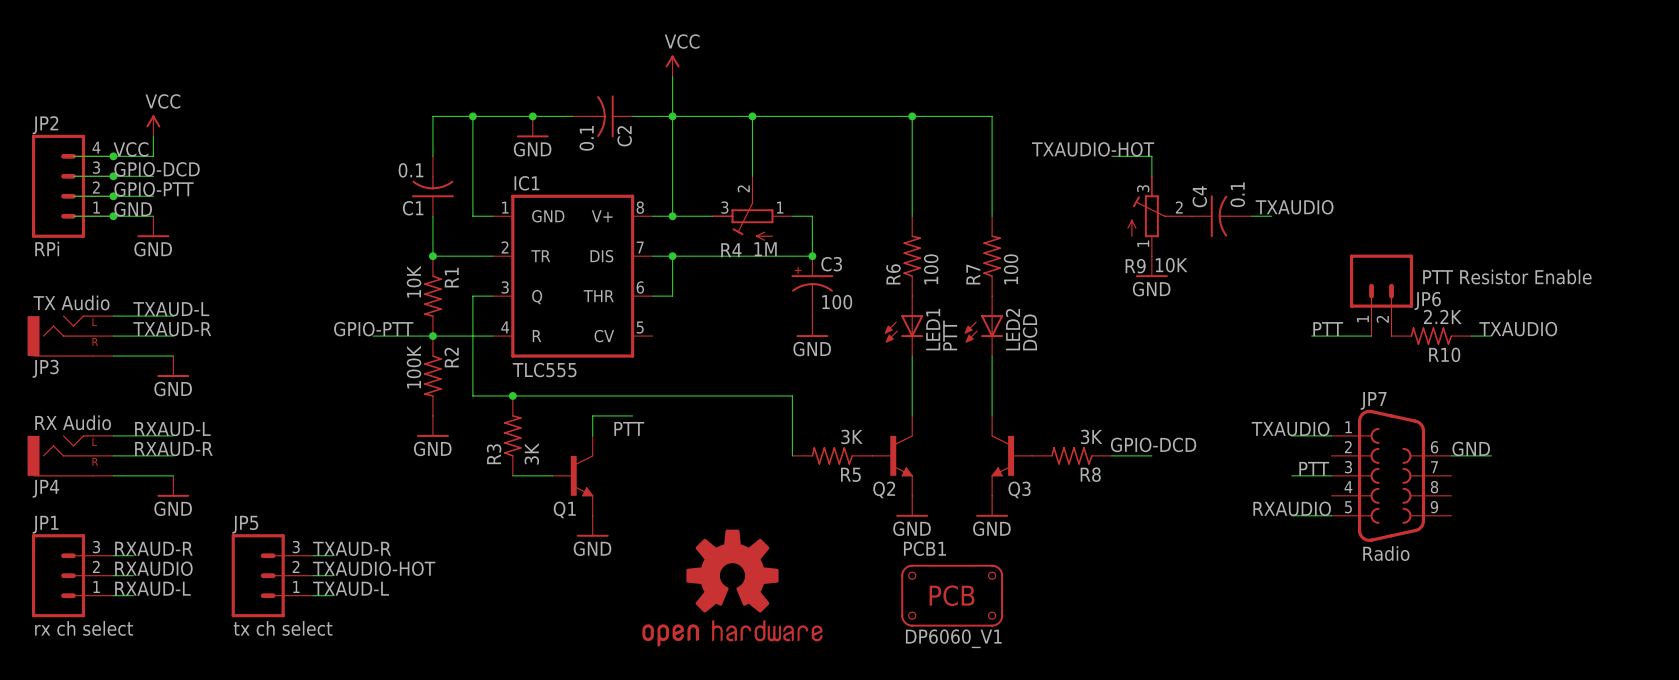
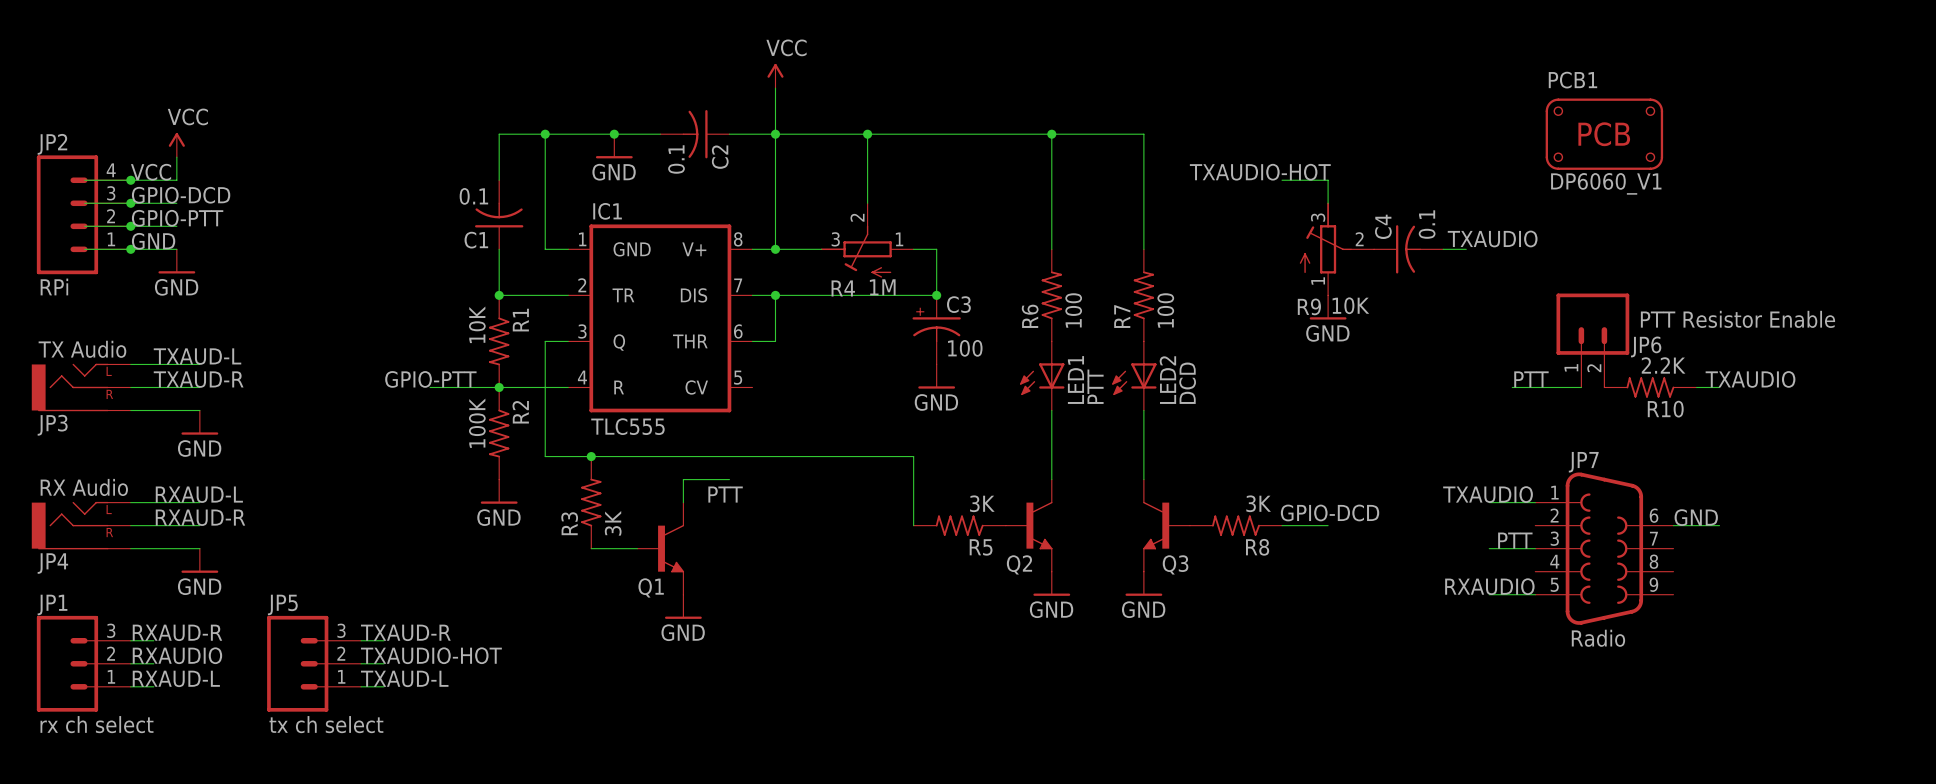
part: (732, 588) -> none
PCB1 position: (952, 595) -> (1604, 134)

